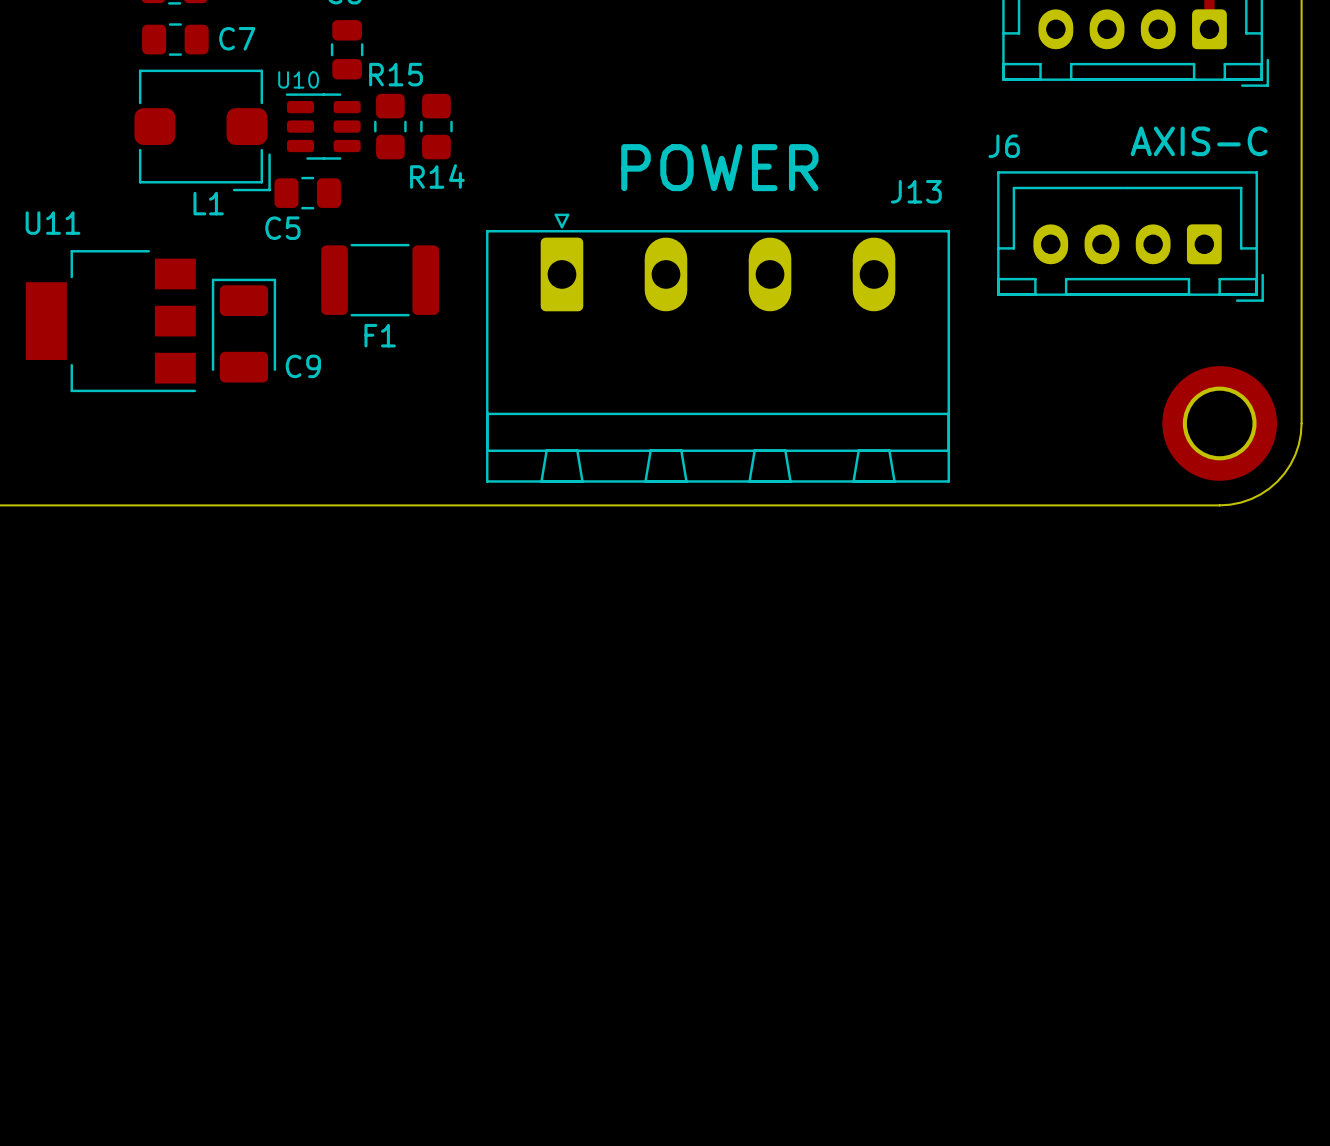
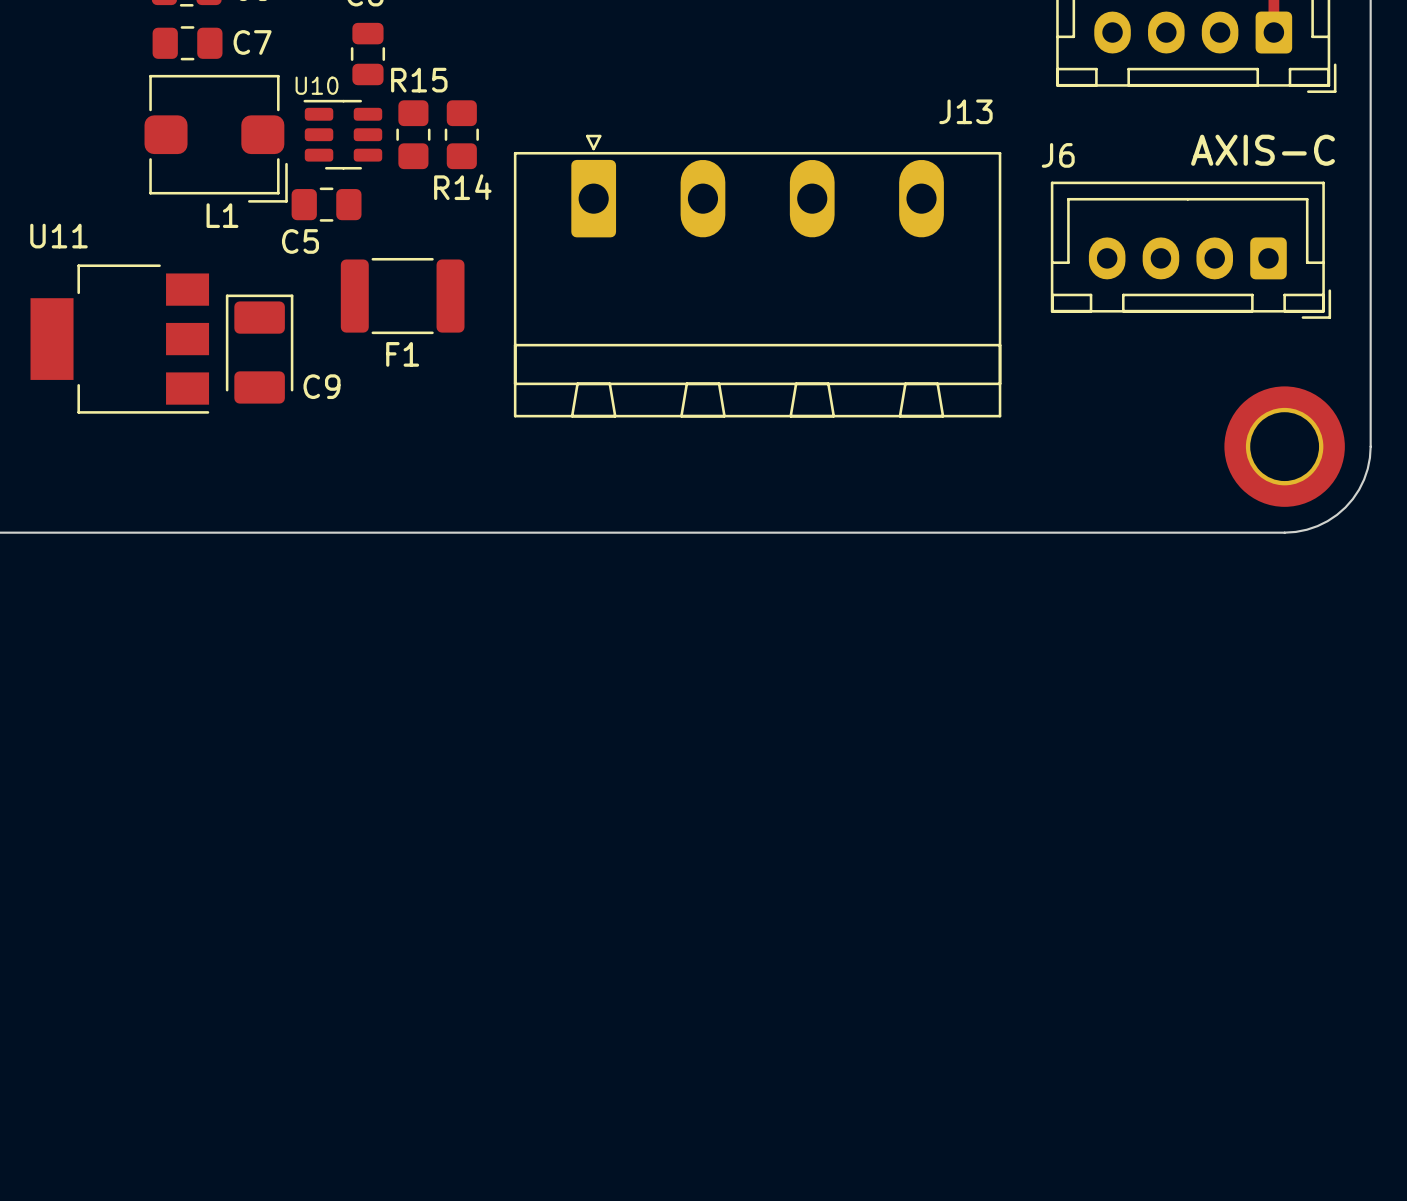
text: POWER (719, 167) -> none
J13 position: (718, 348) -> (757, 276)

